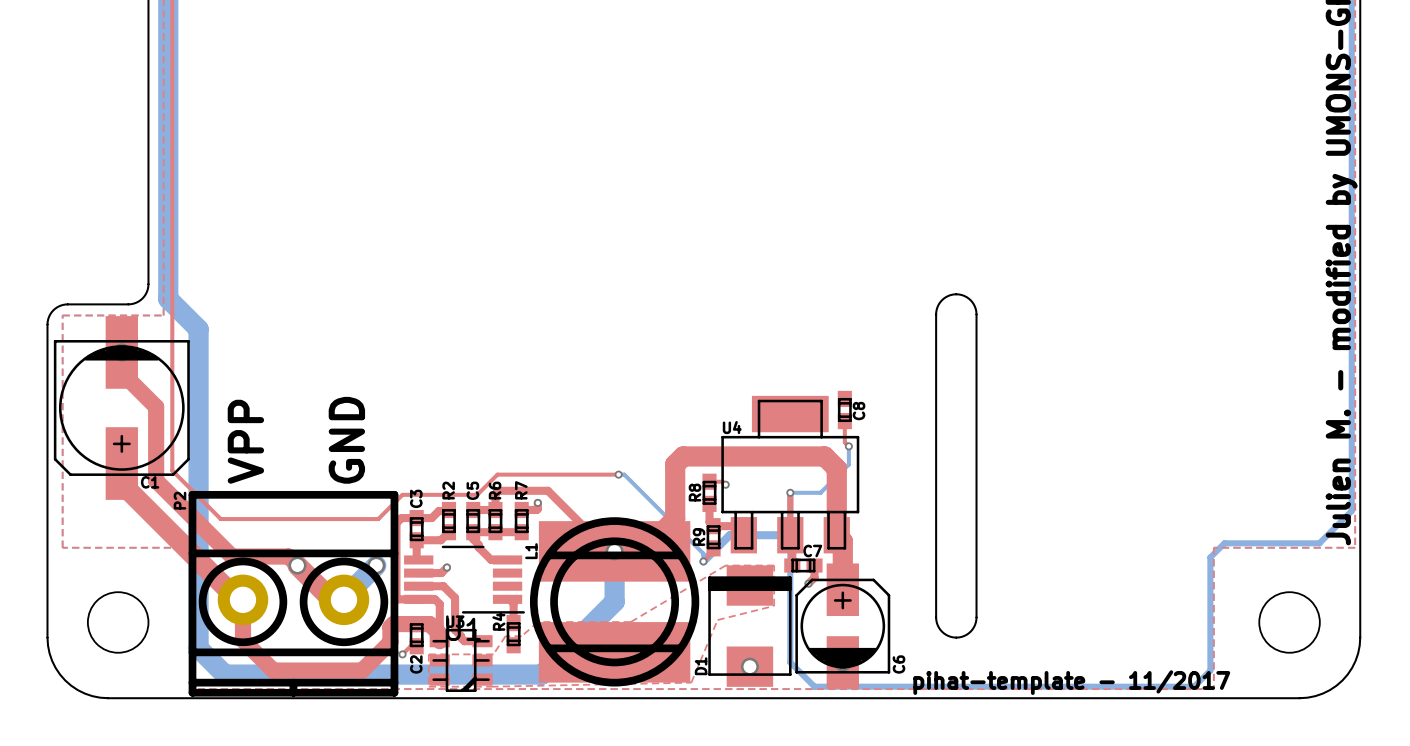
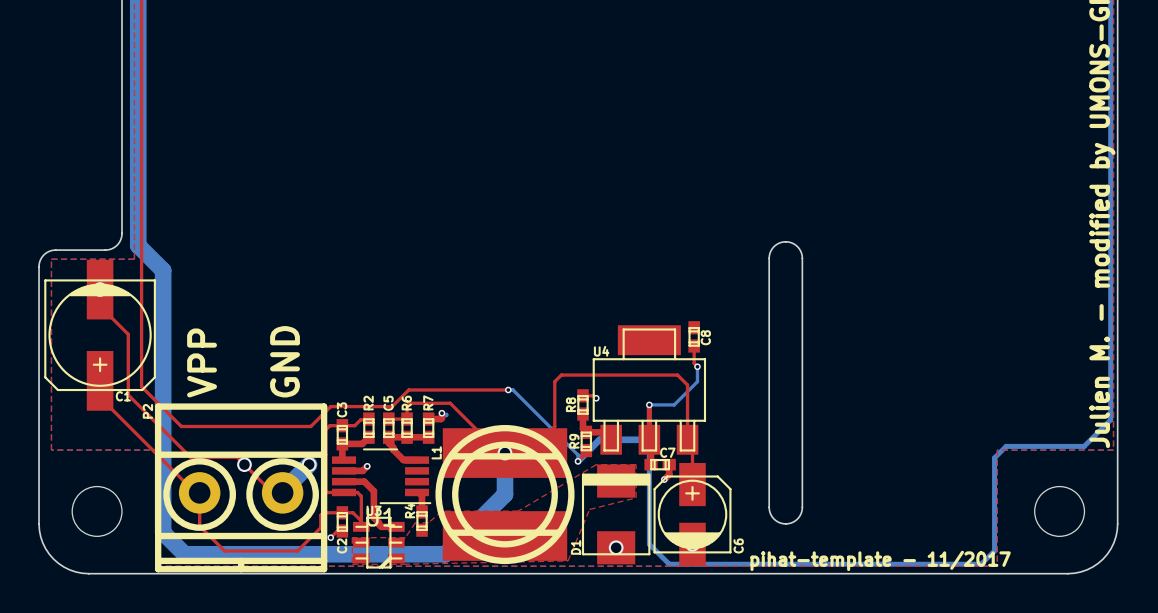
top track width: thick (121, 352) (121, 372) (156, 406) (156, 480) (232, 556) (288, 556) (331, 599) (343, 599) -> thin (100, 289) (100, 306) (128, 334) (128, 394) (190, 457) (237, 457) (272, 492) (282, 492)
top track width: thick (121, 463) (121, 483) (237, 599) (242, 599) (242, 640) (273, 670) (362, 670) (390, 642) (390, 627) (393, 624) (429, 624) (439, 634) (439, 641) (439, 604) (435, 599) (398, 599) (396, 597) (396, 523) (401, 518) (431, 518) (438, 511) (448, 510) -> thin (100, 380) (100, 397) (195, 492) (199, 492) (199, 526) (224, 550) (297, 550) (320, 527) (320, 515) (323, 512) (353, 512) (361, 521) (361, 526) (361, 496) (357, 492) (325, 491) (325, 429) (329, 425) (354, 425) (360, 419) (368, 419)
bottom track: none -> (446, 414) (445, 415)
top track width: thick (473, 510) (495, 510) (495, 493) (498, 490) (547, 490) (608, 551) (642, 551) (675, 519) (675, 464) (683, 456) (824, 456) (836, 468) (836, 535) (842, 541) (842, 589) -> thin (388, 419) (407, 419) (407, 405) (409, 403) (450, 403) (500, 453) (528, 453) (554, 426) (554, 381) (561, 375) (677, 375) (687, 385) (687, 439) (692, 444) (692, 484)

